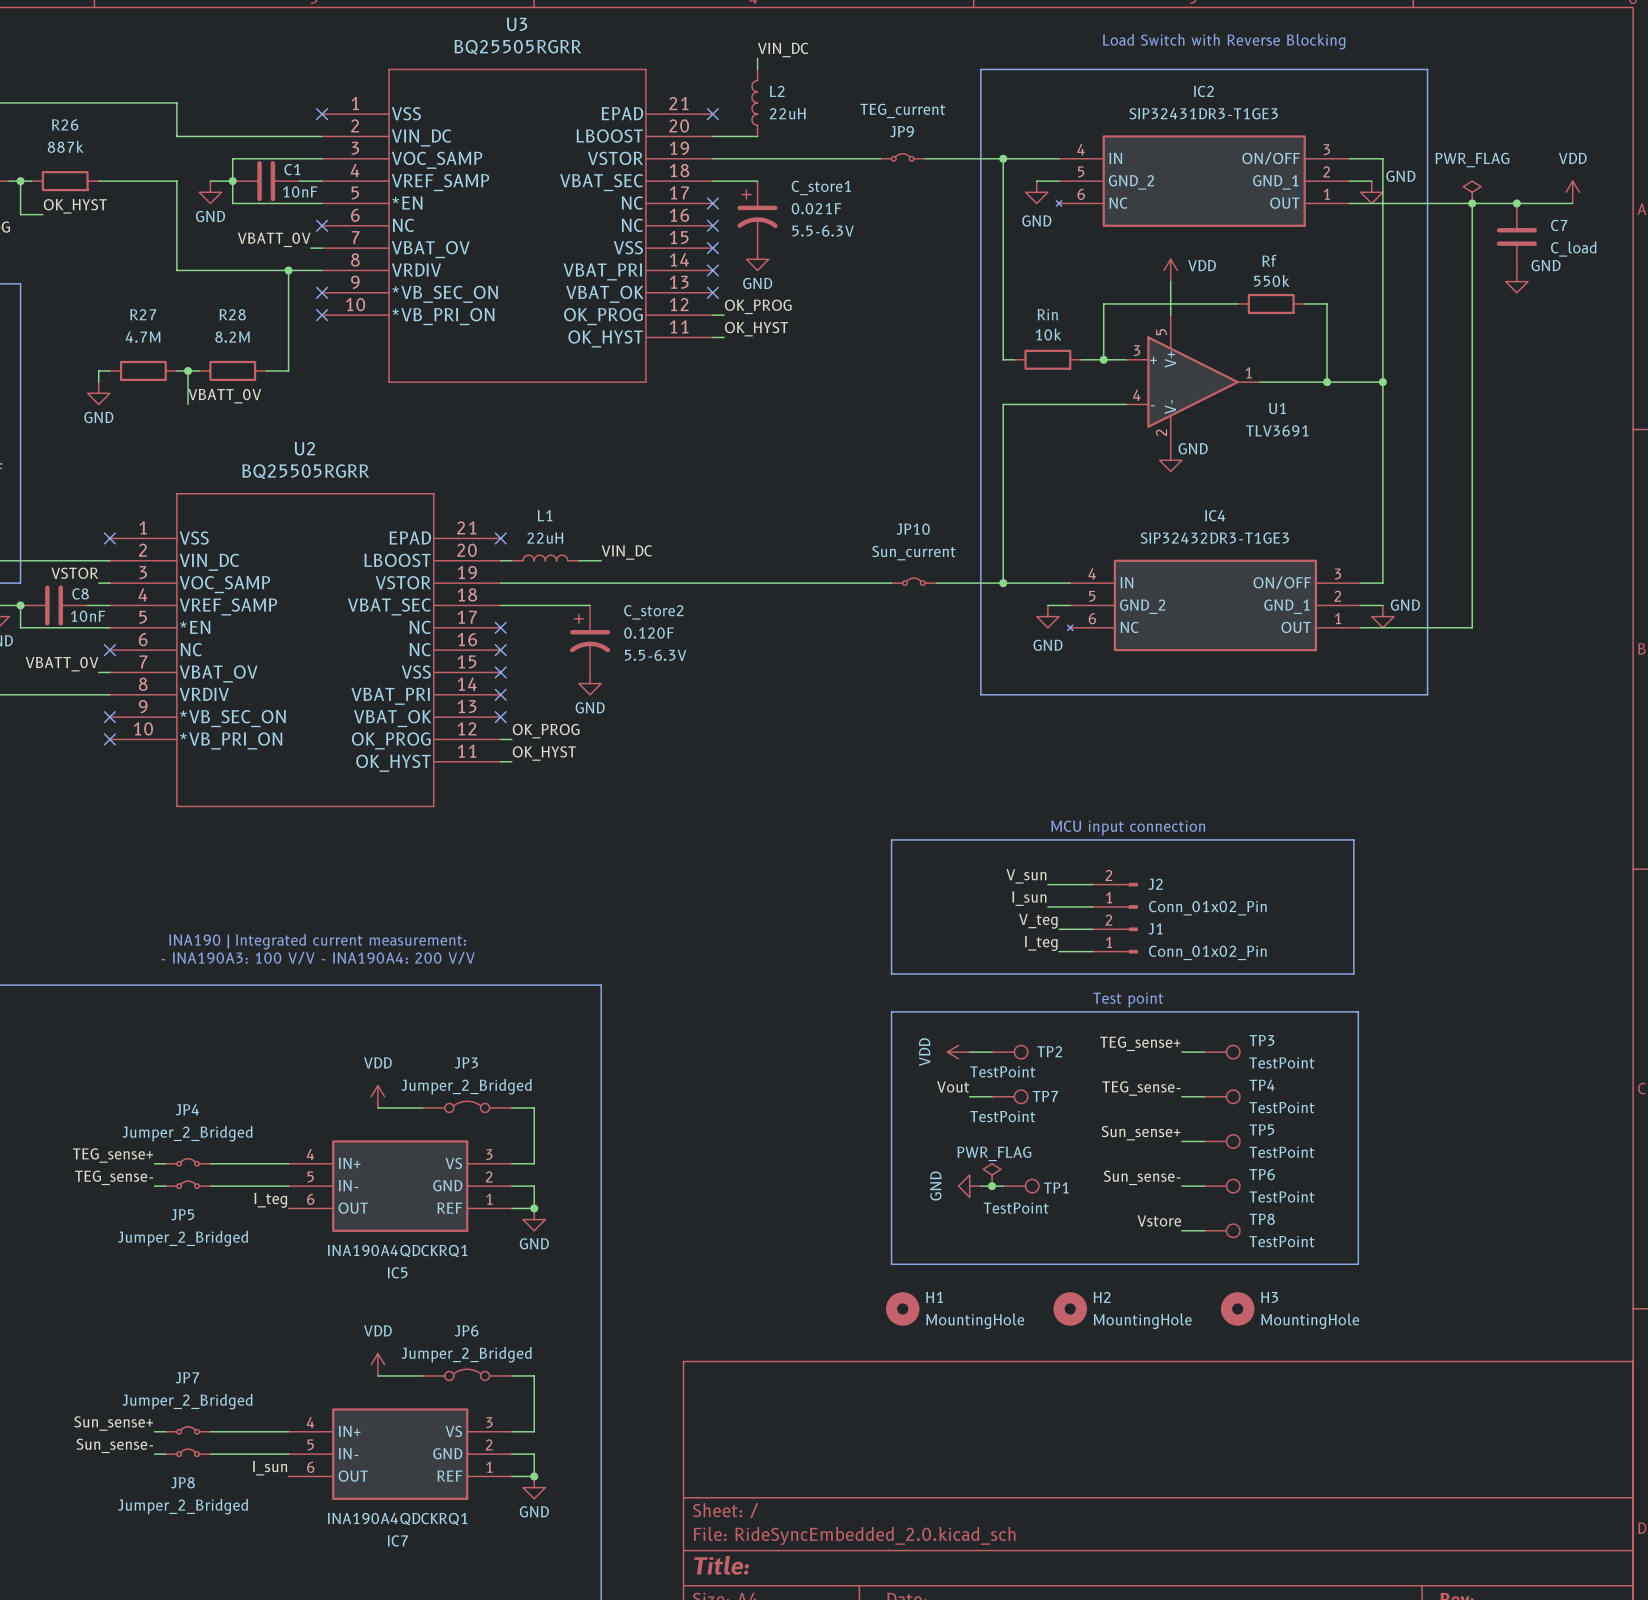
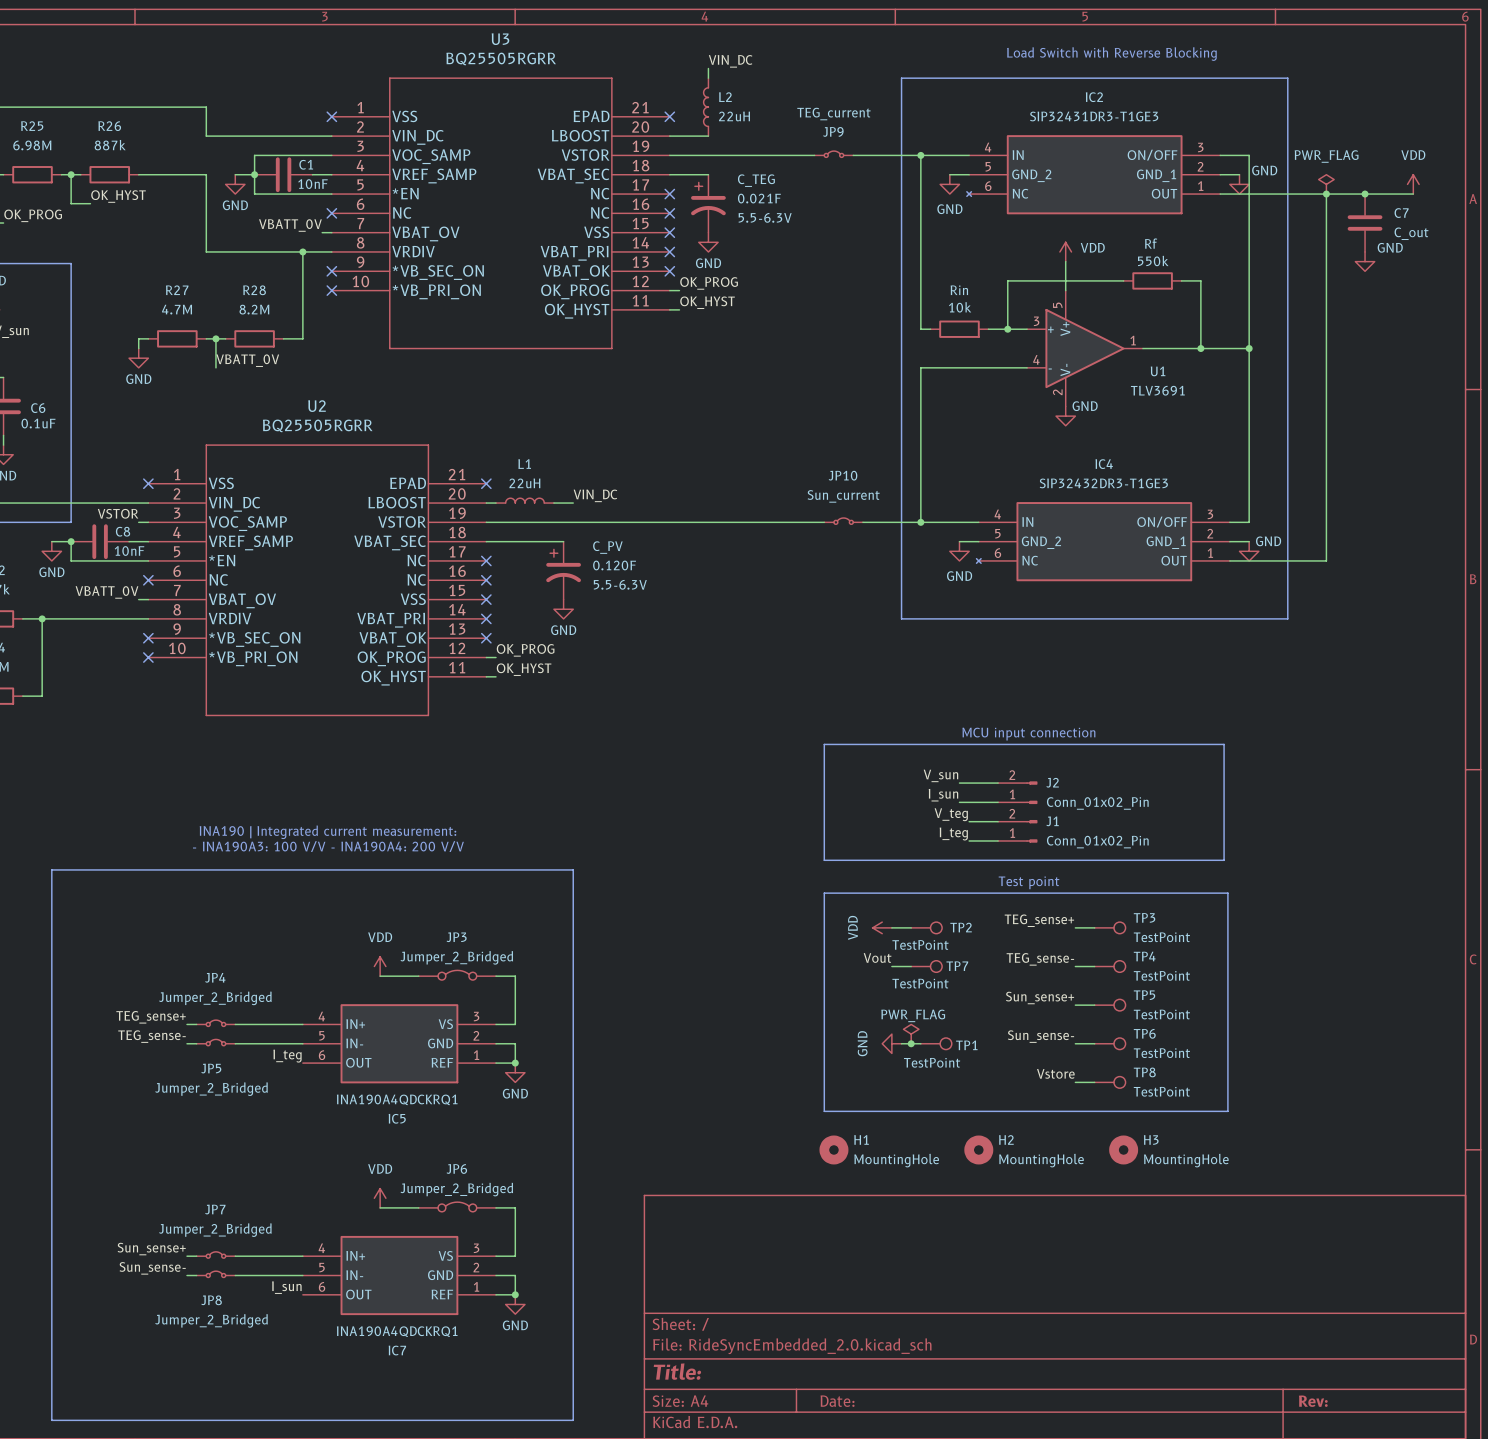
C_store1 name: C_store1 (821, 187) -> C_TEG (756, 180)
C7 value: C_load (1573, 249) -> C_out (1411, 233)
C_store2 name: C_store2 (653, 612) -> C_PV (607, 547)

